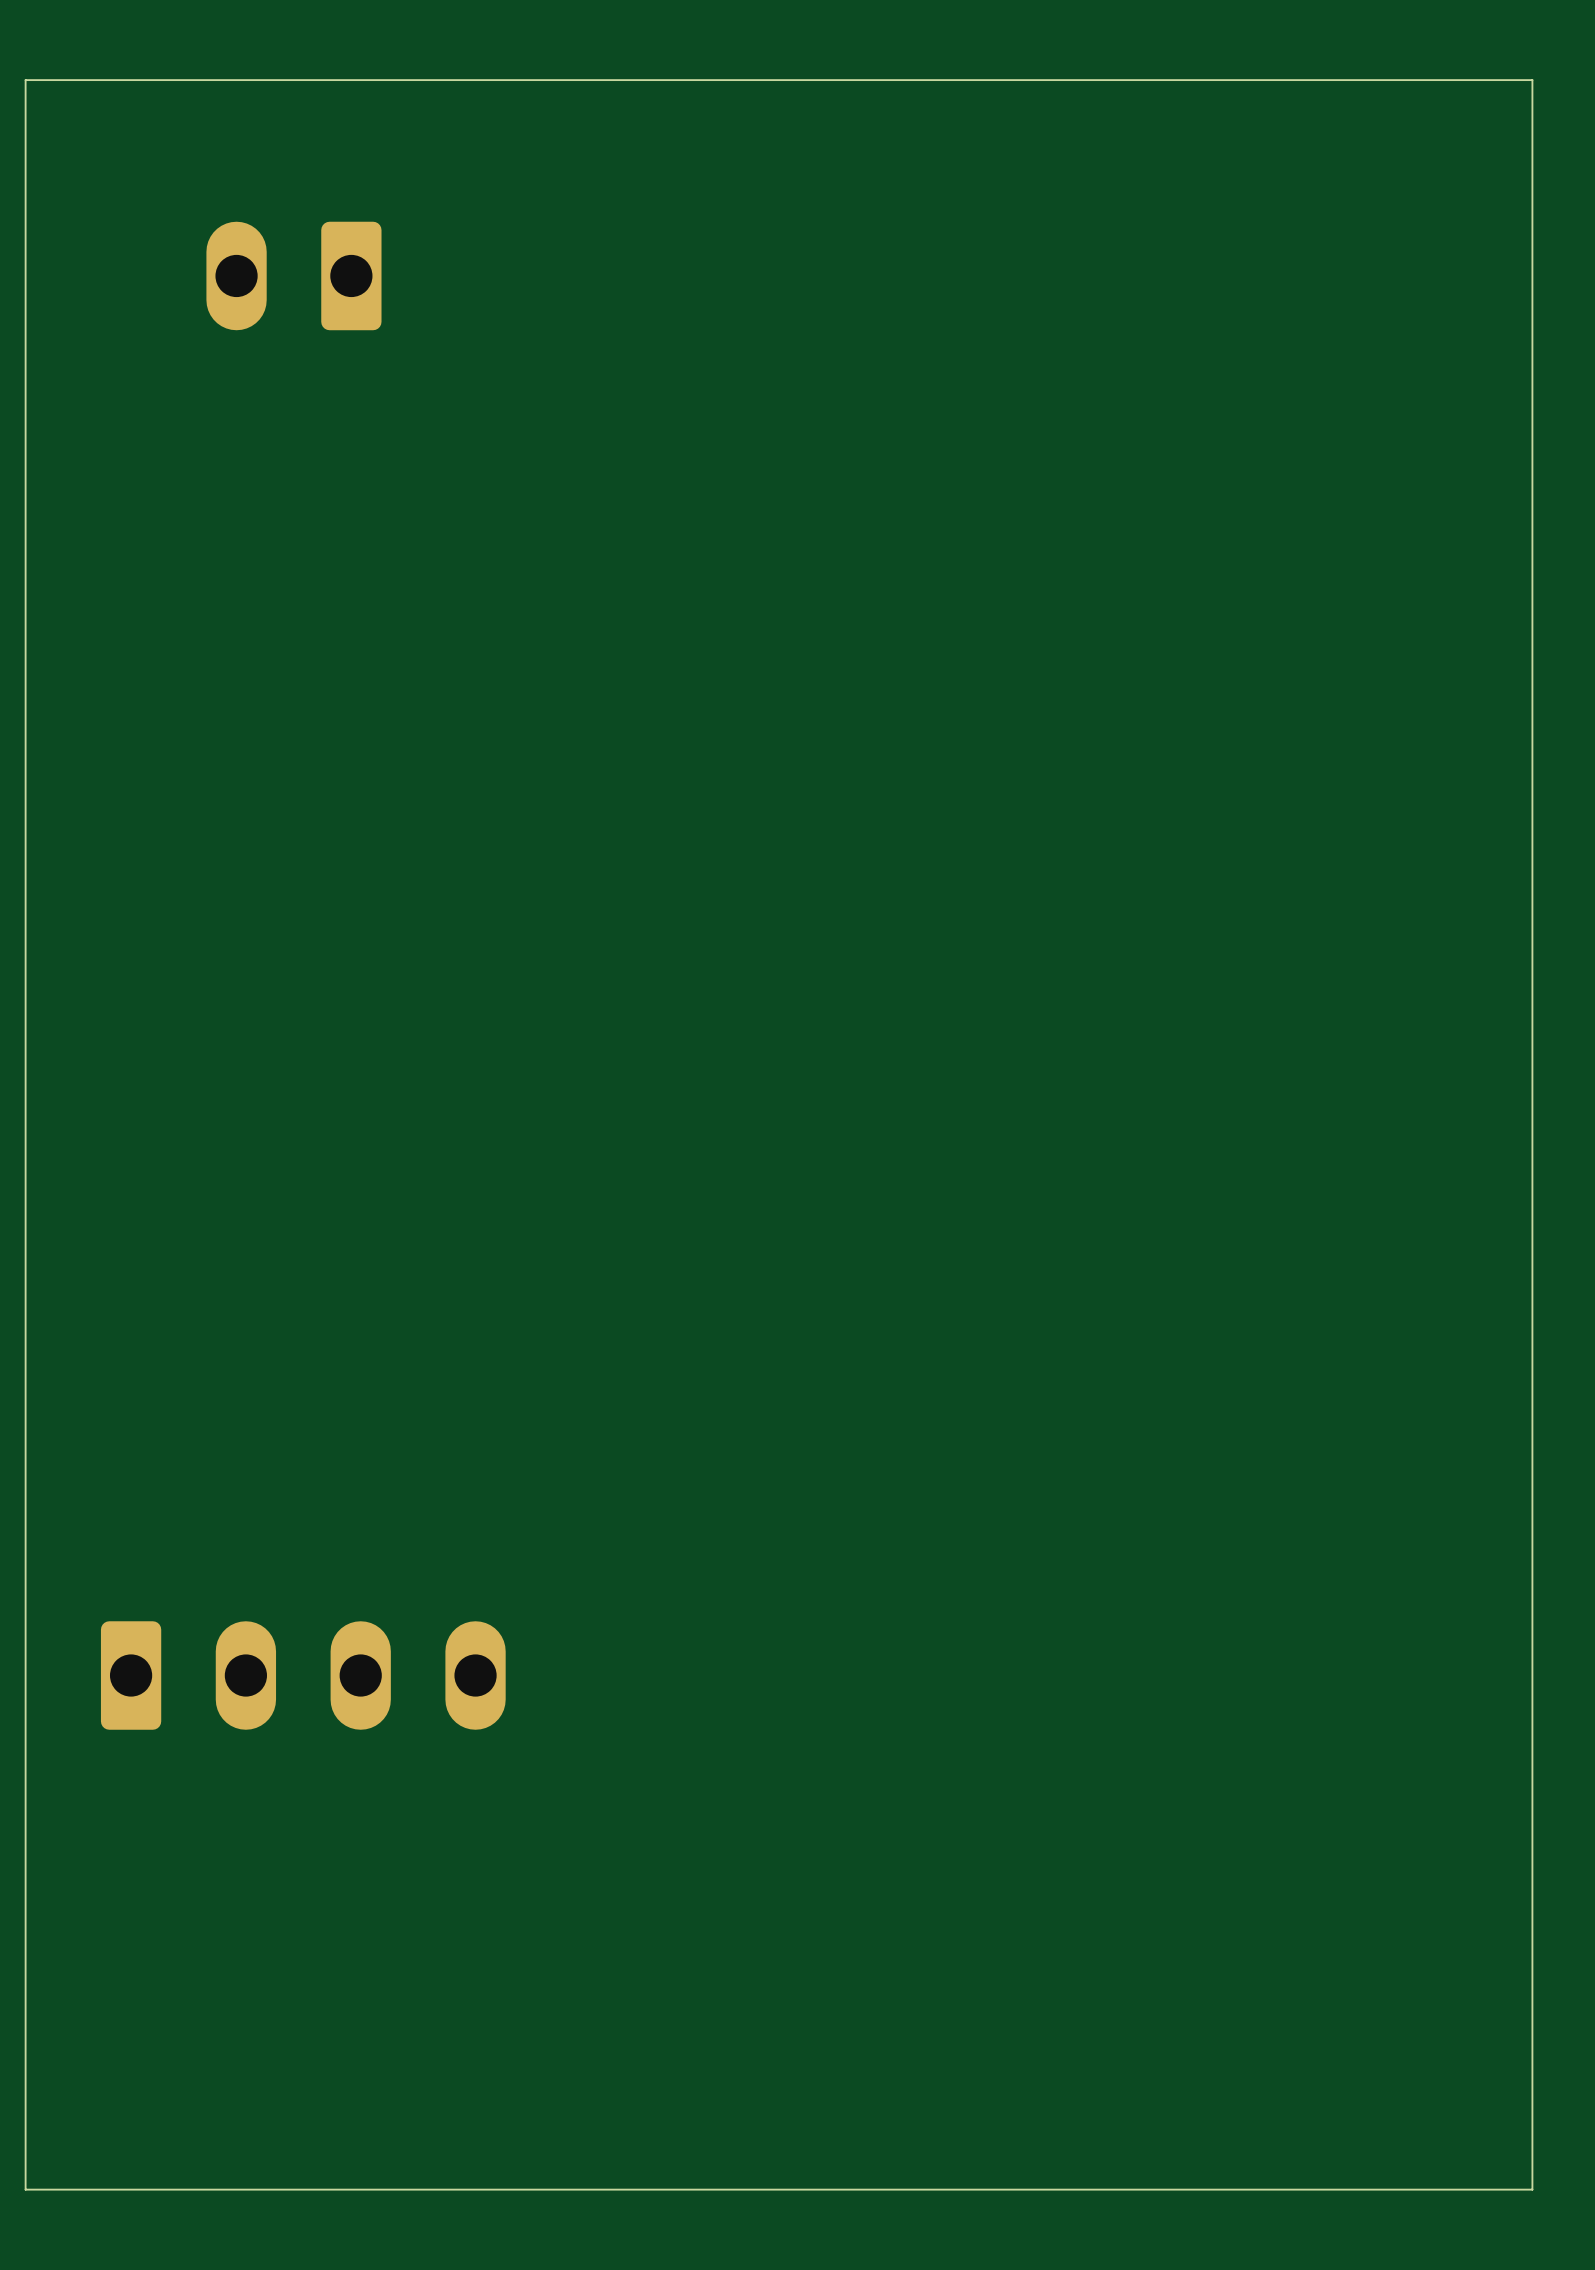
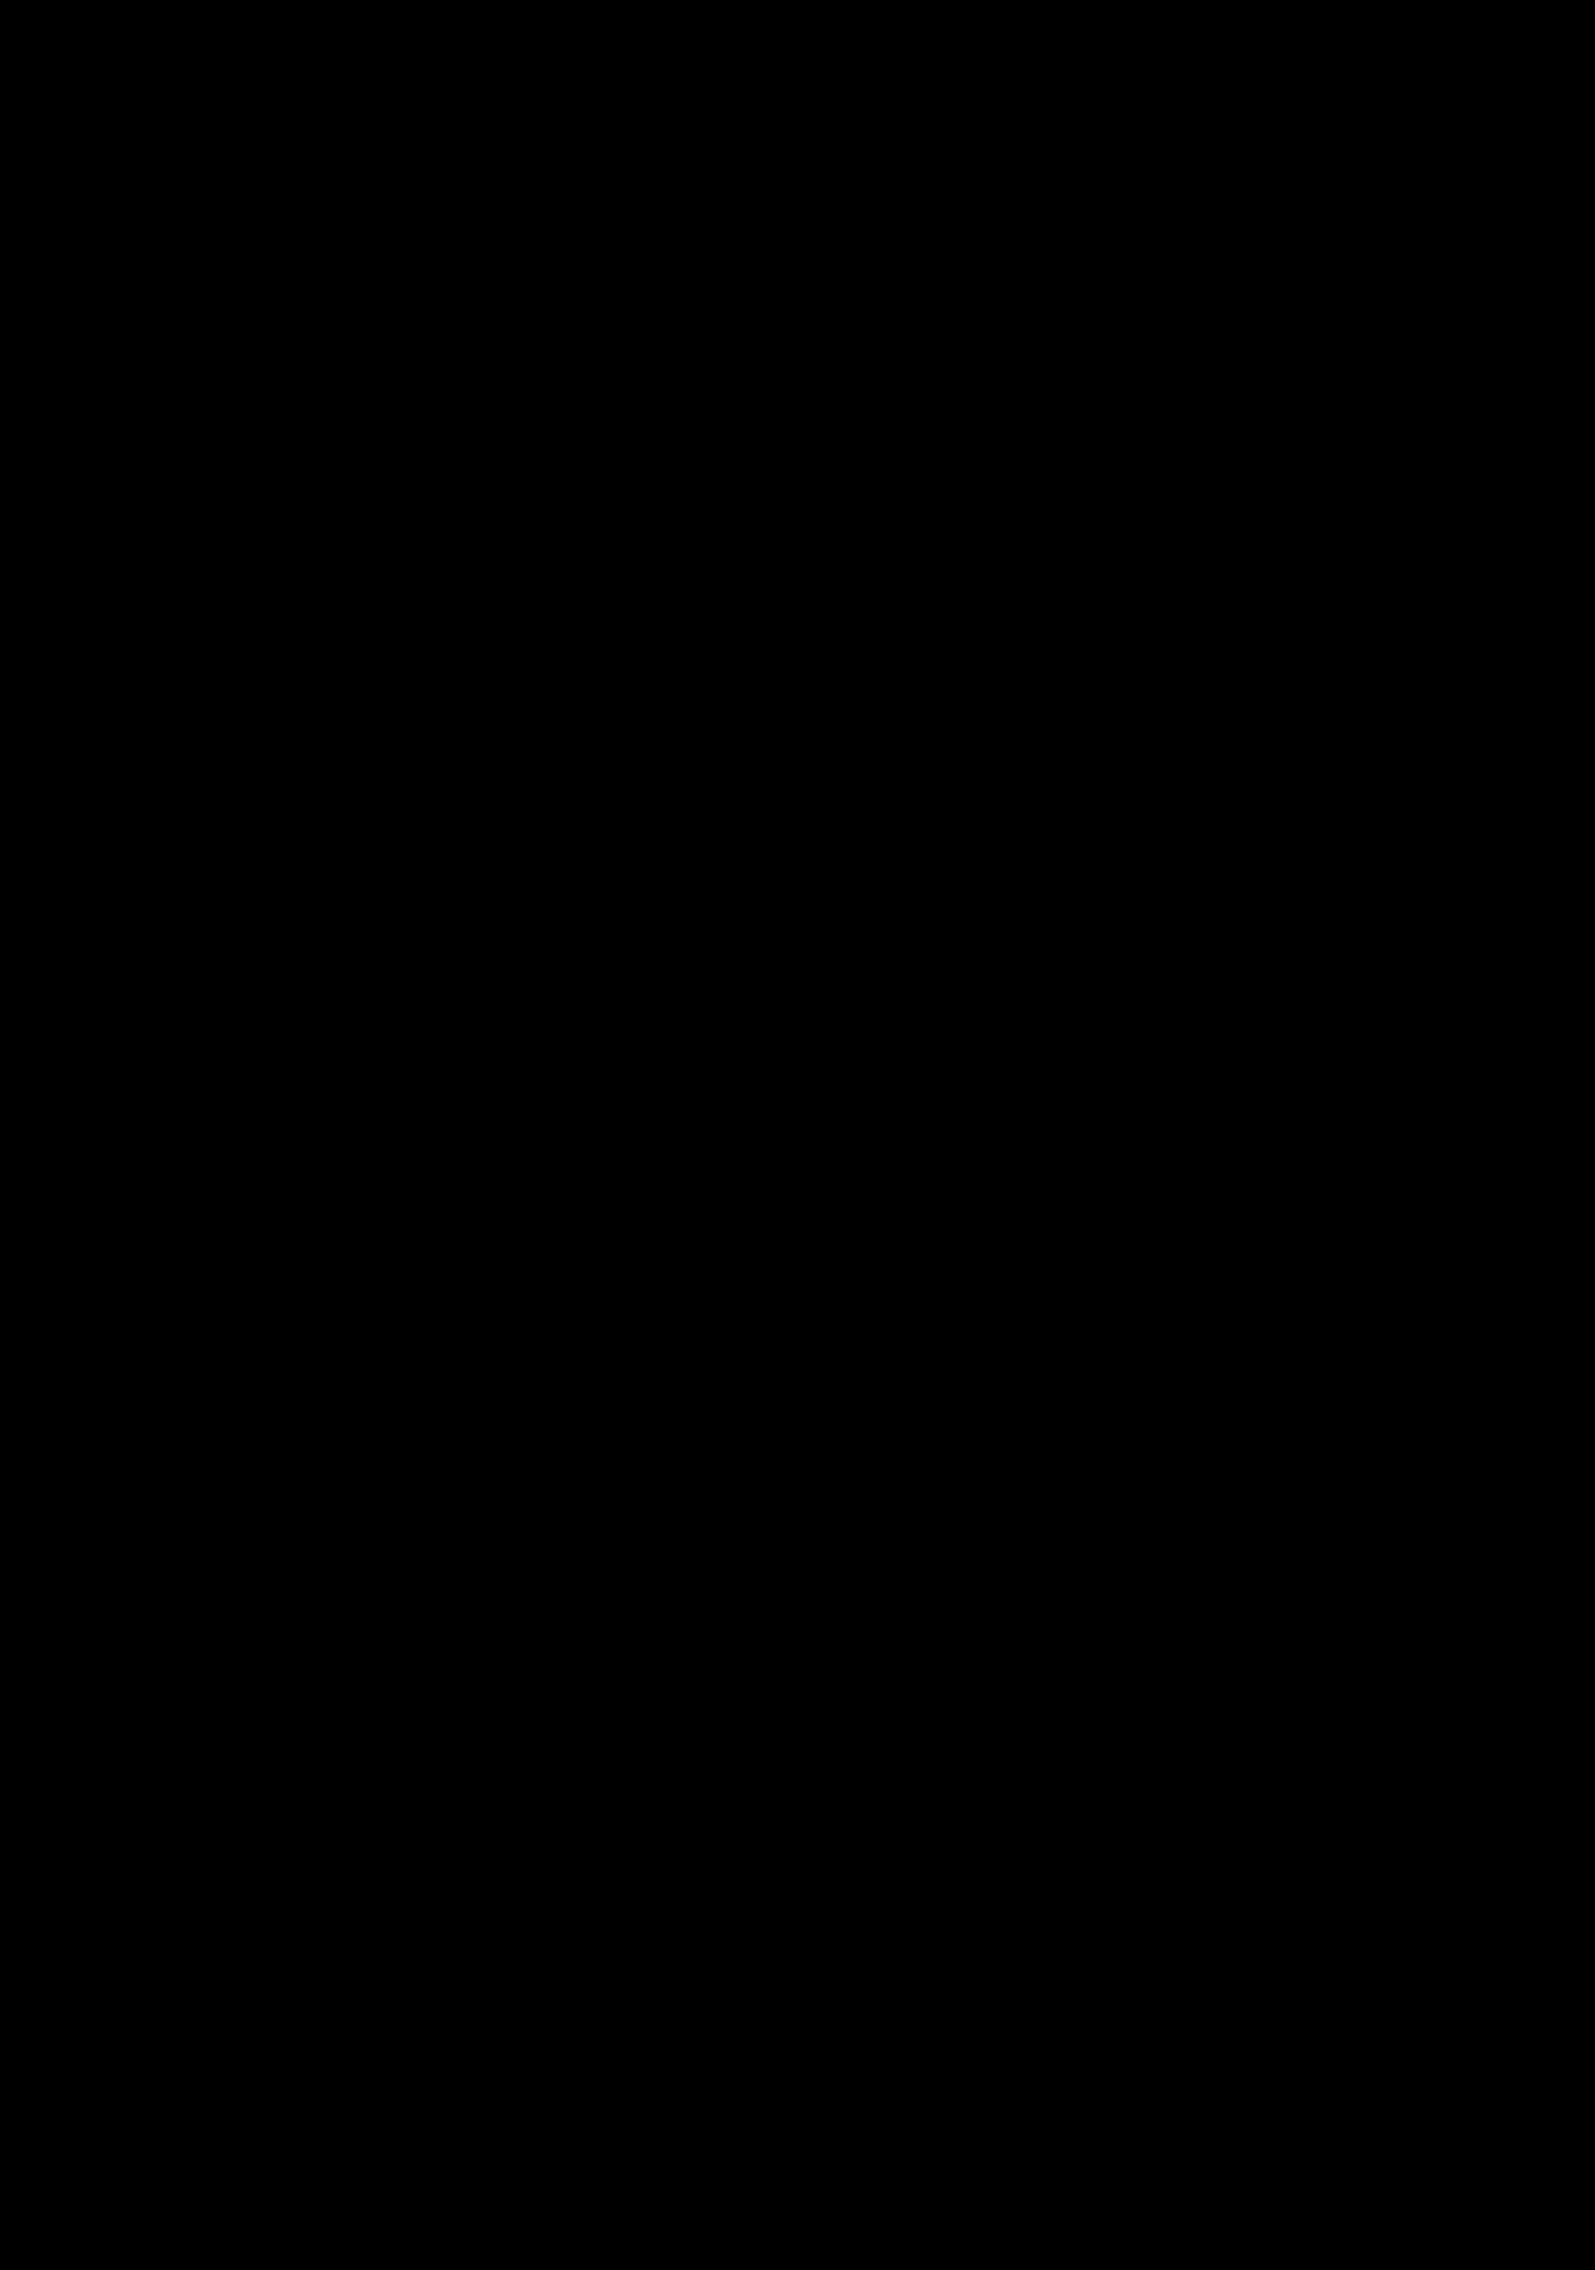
board edge: (1532, 80) (25, 80) (25, 2189) (1532, 2189) (1532, 80) -> none
part: (293, 275) -> none
part: (303, 1675) -> none

